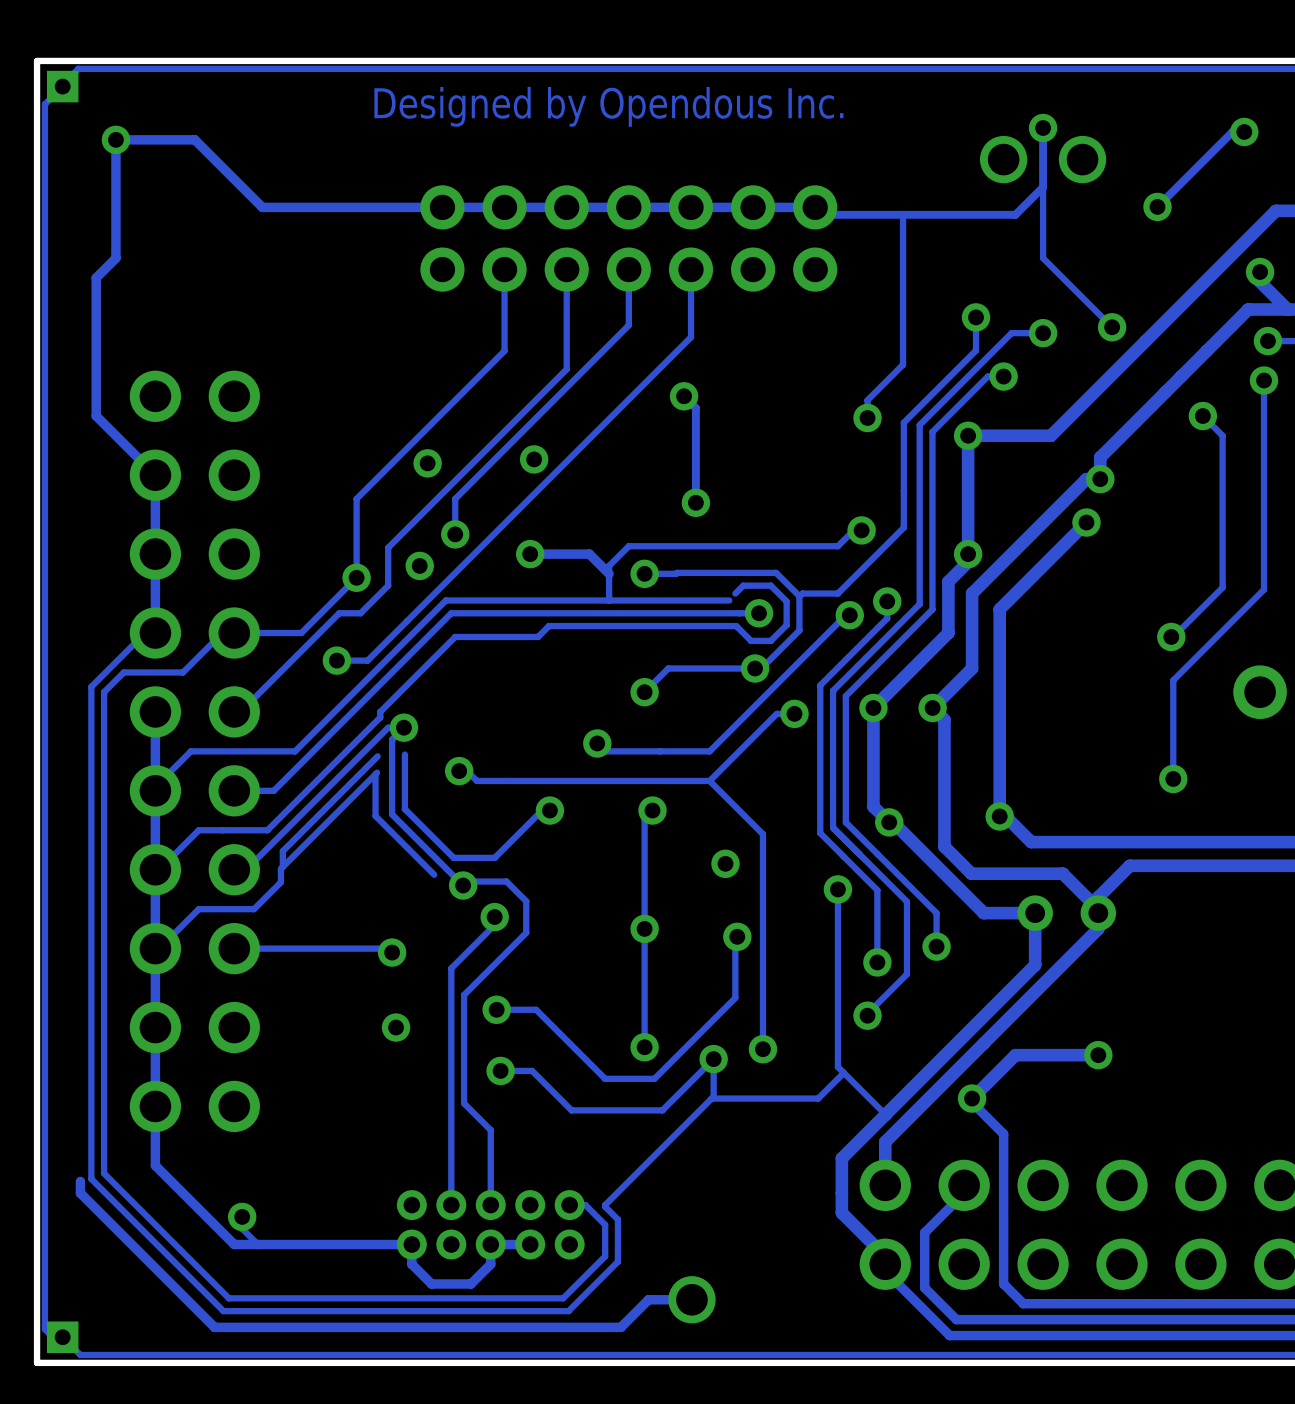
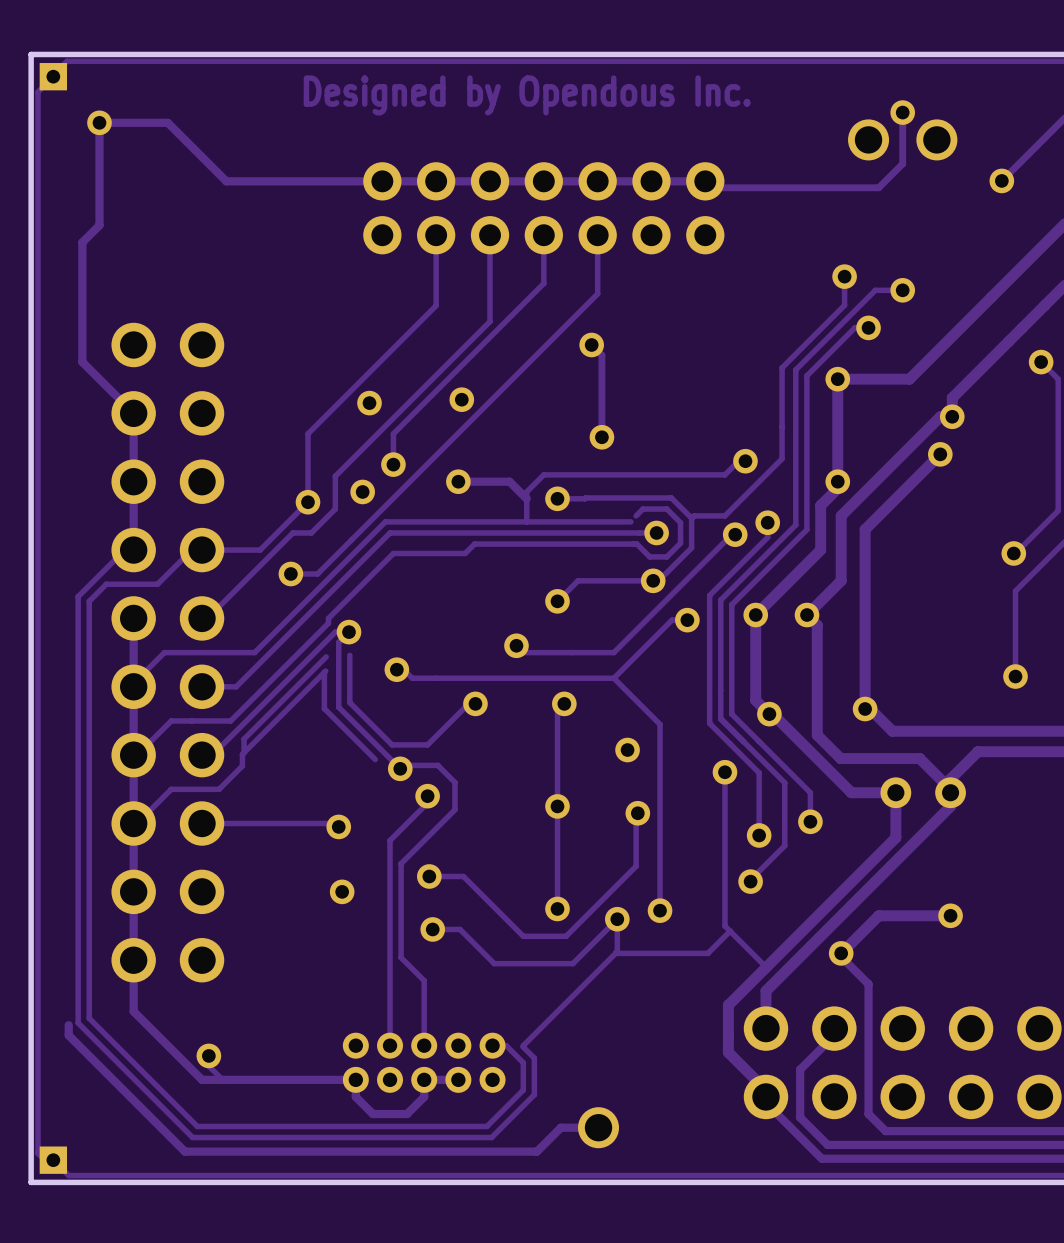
track: (1043, 128) (1043, 258) (1112, 327) -> none
track: (903, 214) (903, 364) (867, 400) (867, 417) -> none
part: (1112, 327) -> none
part: (867, 417) -> none

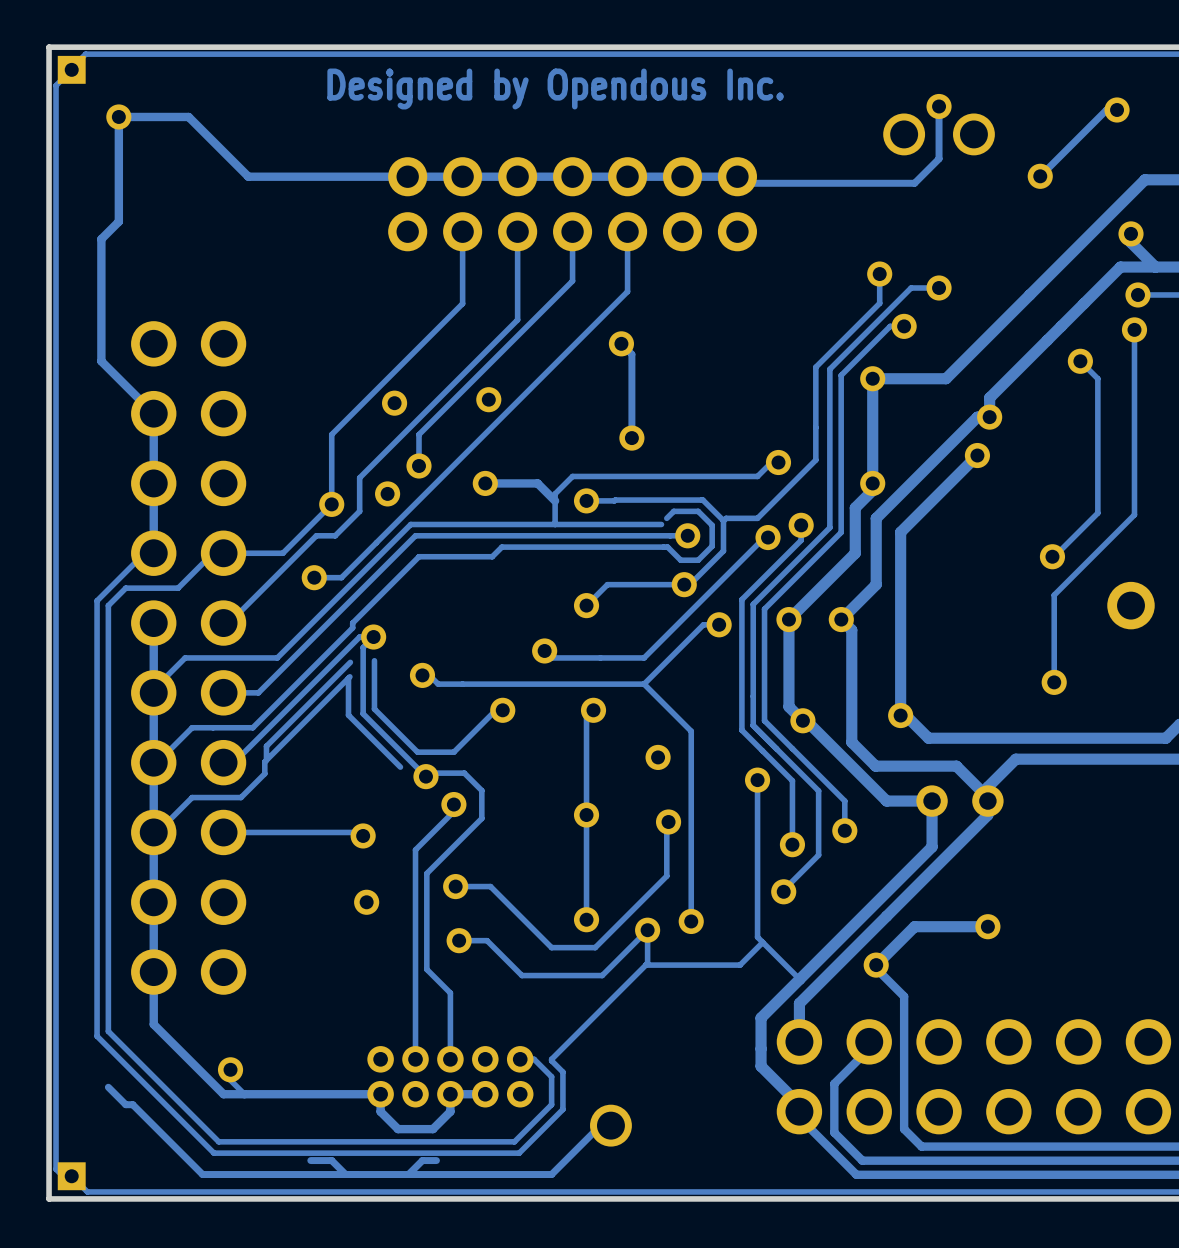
track: (68, 1025) (68, 1035) (184, 1151) (536, 1151) (560, 1127) (598, 1127) -> none
track: none -> (108, 1087) (125, 1104) (132, 1104) (202, 1174) (551, 1174) (600, 1125) (610, 1125)
part position: (598, 1127) -> (610, 1125)
track: none -> (310, 1160) (331, 1160) (345, 1174)
track: none -> (436, 1160) (422, 1160) (408, 1174)

